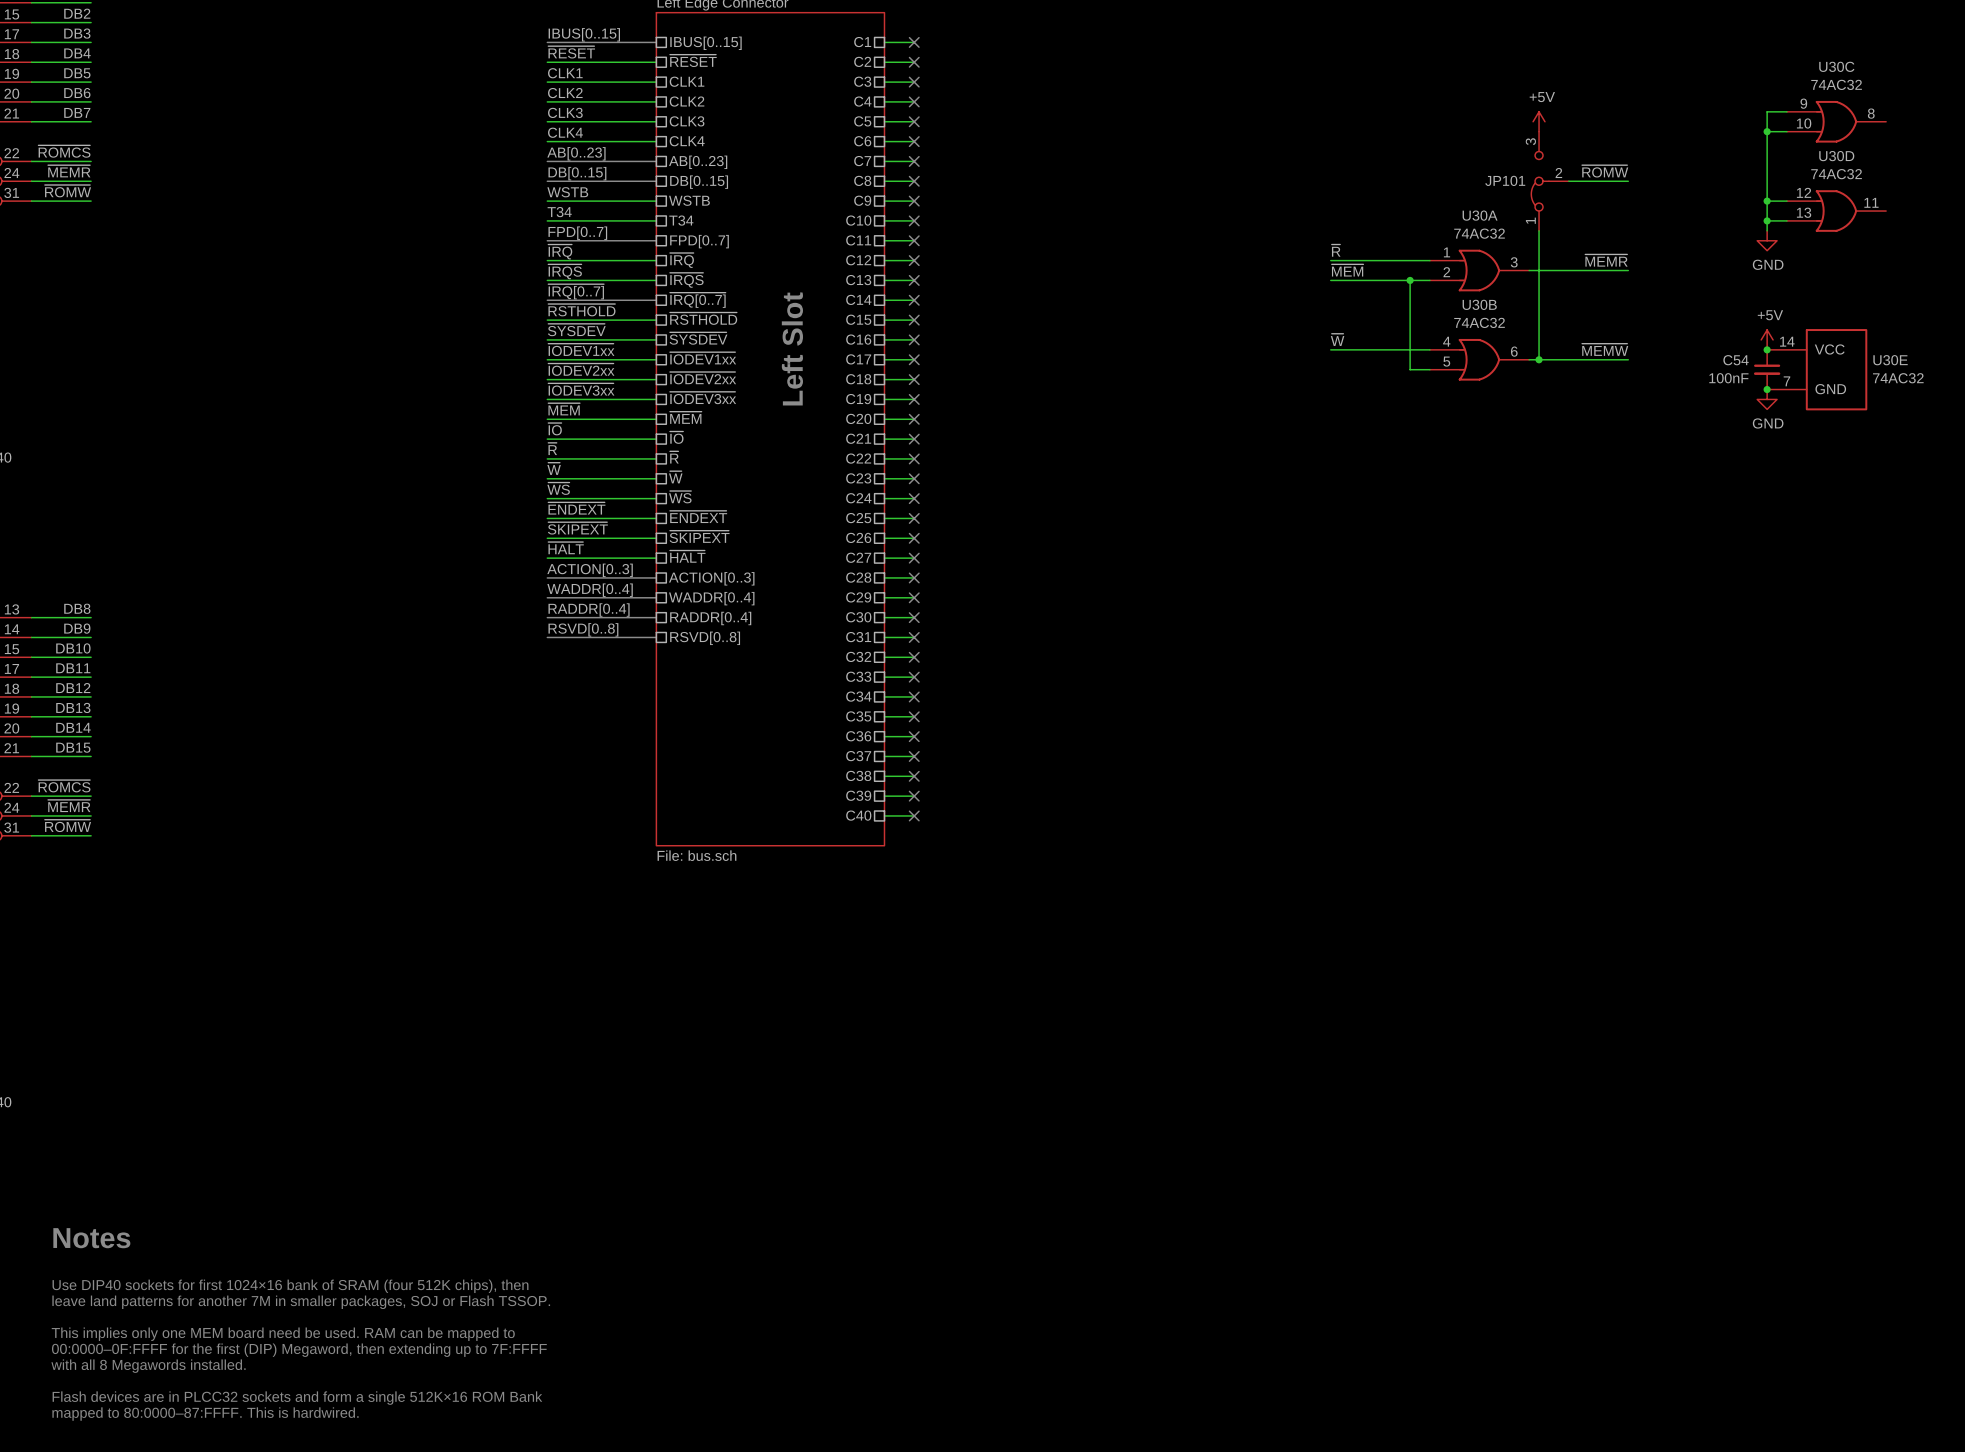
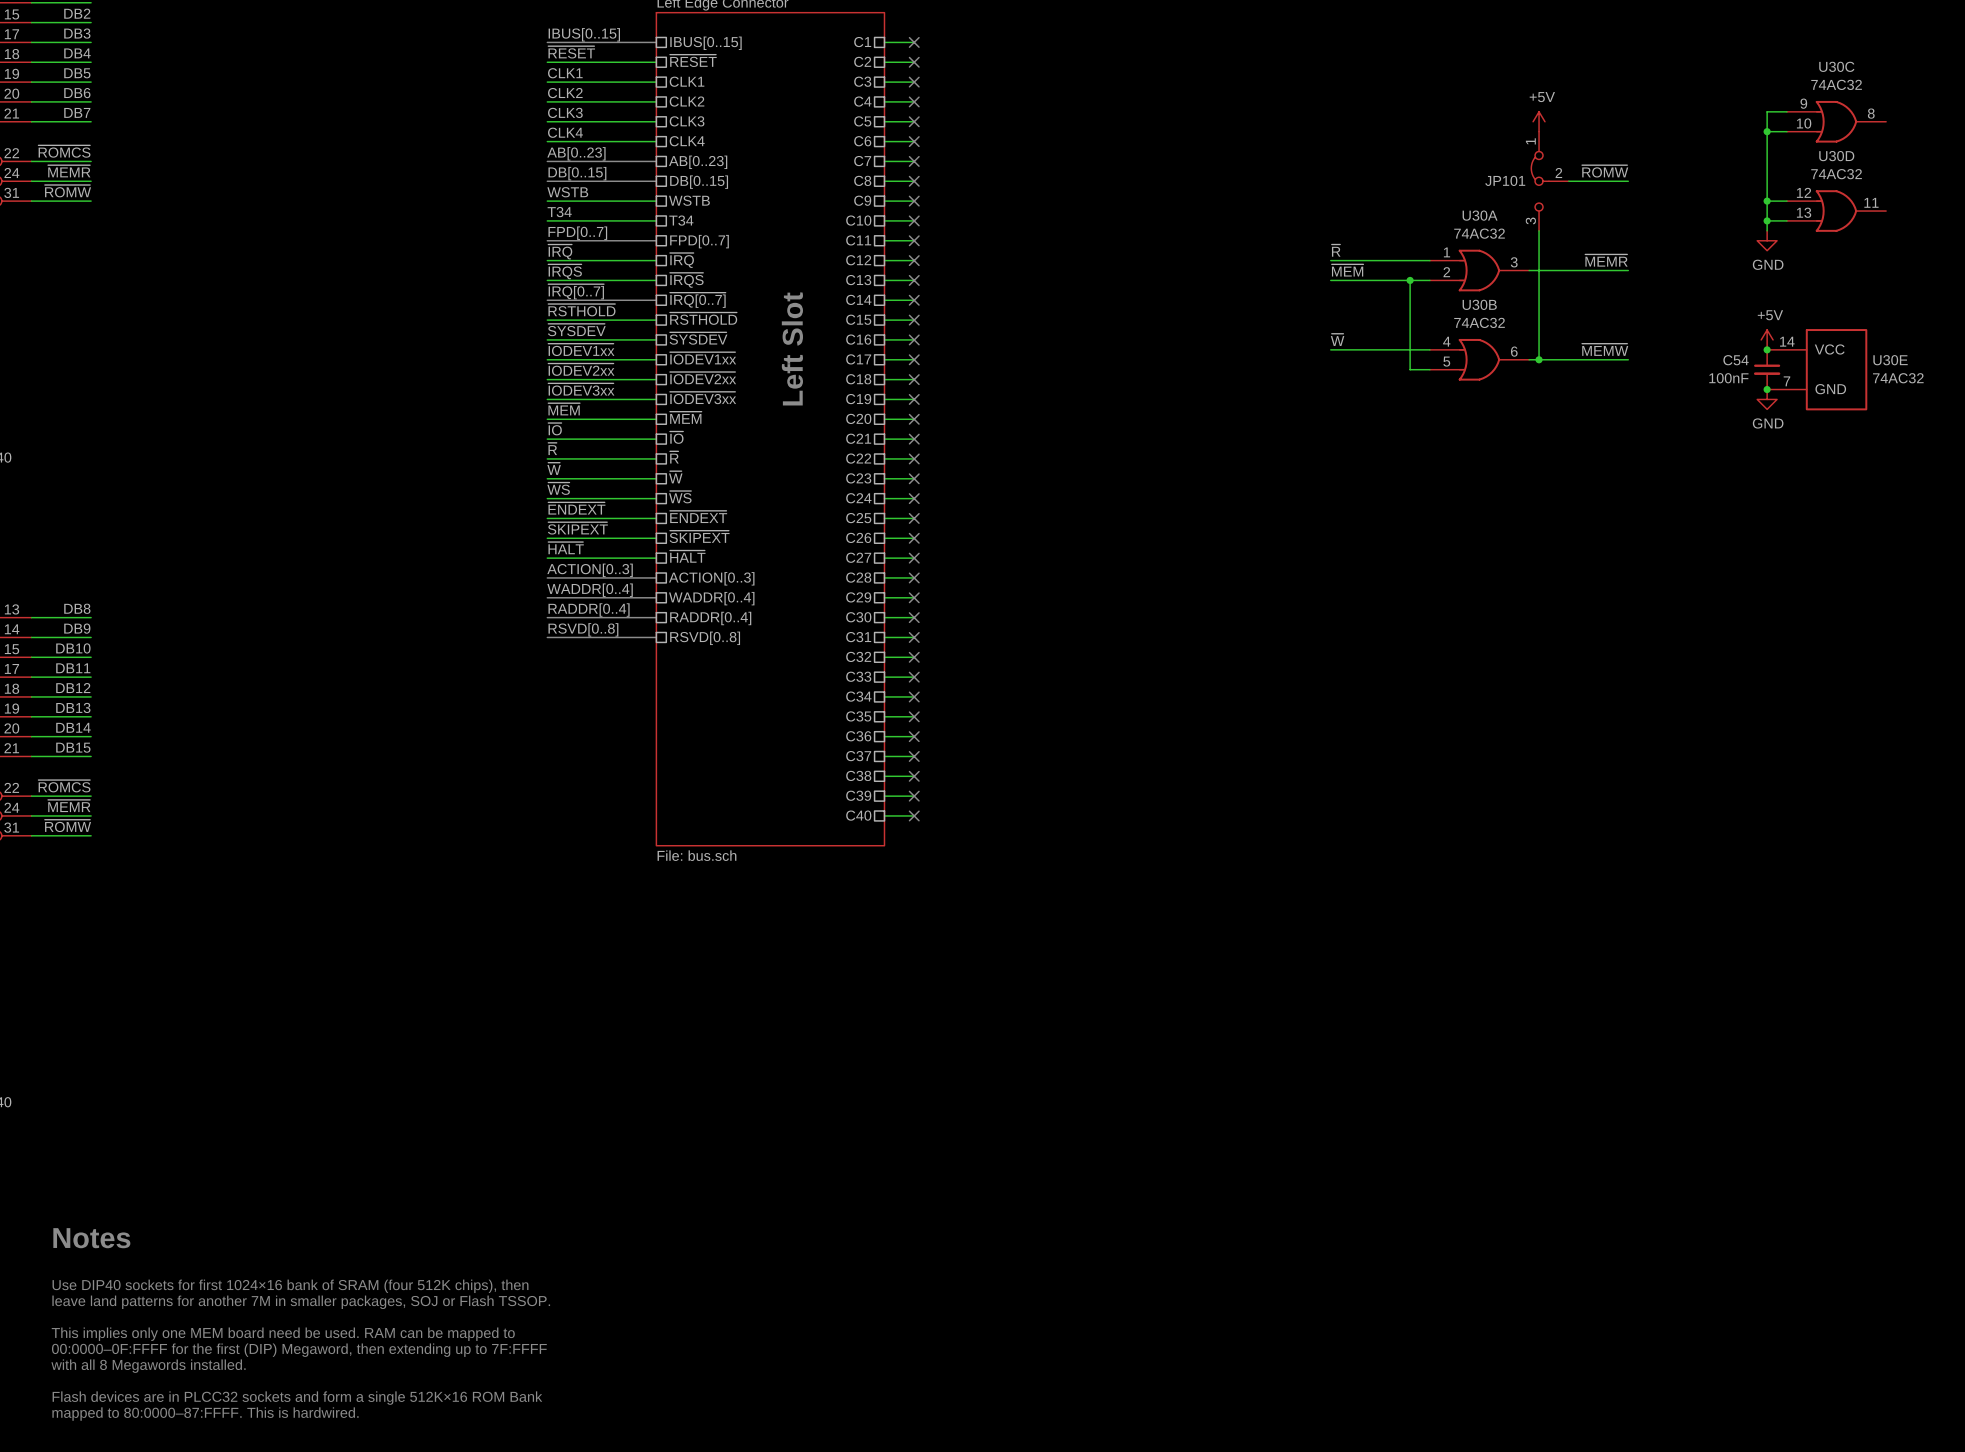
JP101 flip: as is (1540, 181) -> up-down (1540, 181)

